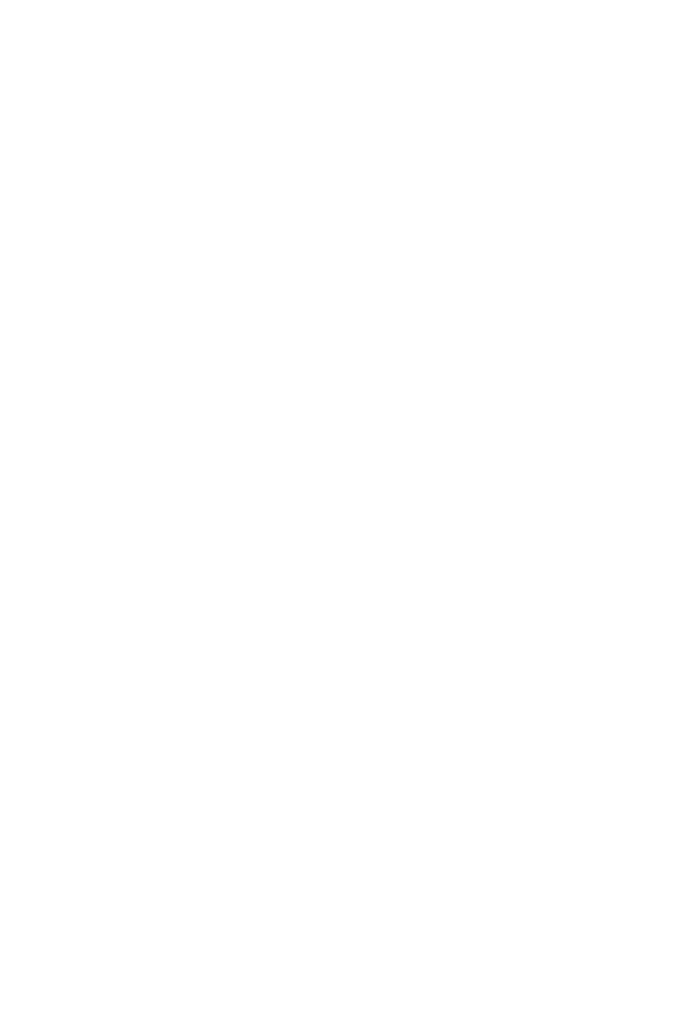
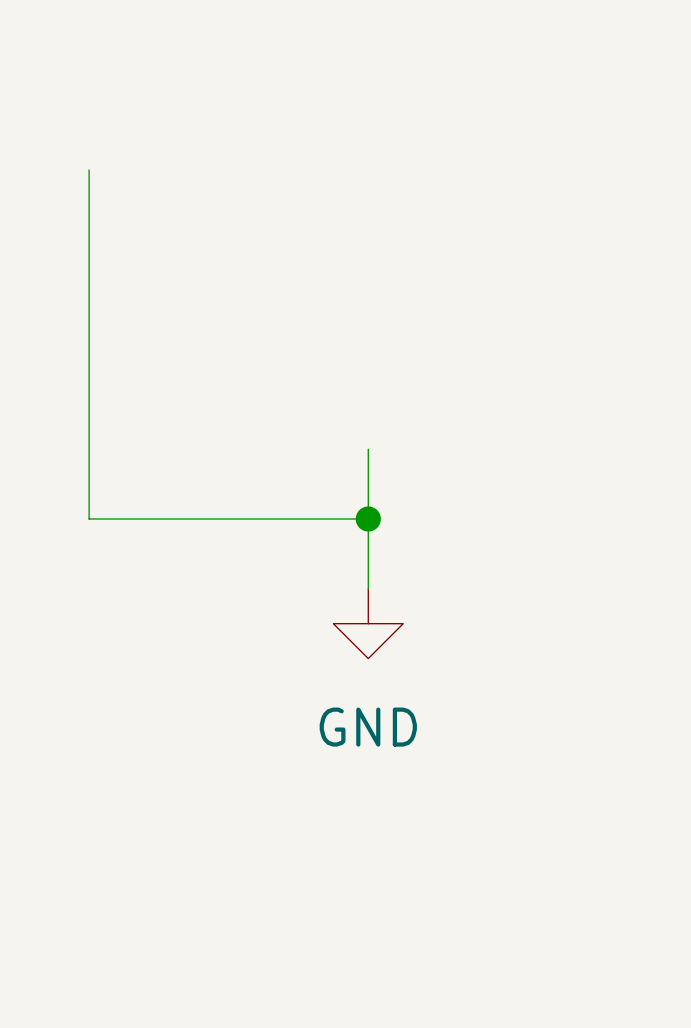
wire: none -> (89, 170) (89, 519) (368, 519)
wire: none -> (368, 449) (368, 588)
junction: none -> (368, 519)
power symbol: none -> GND (368, 623)

